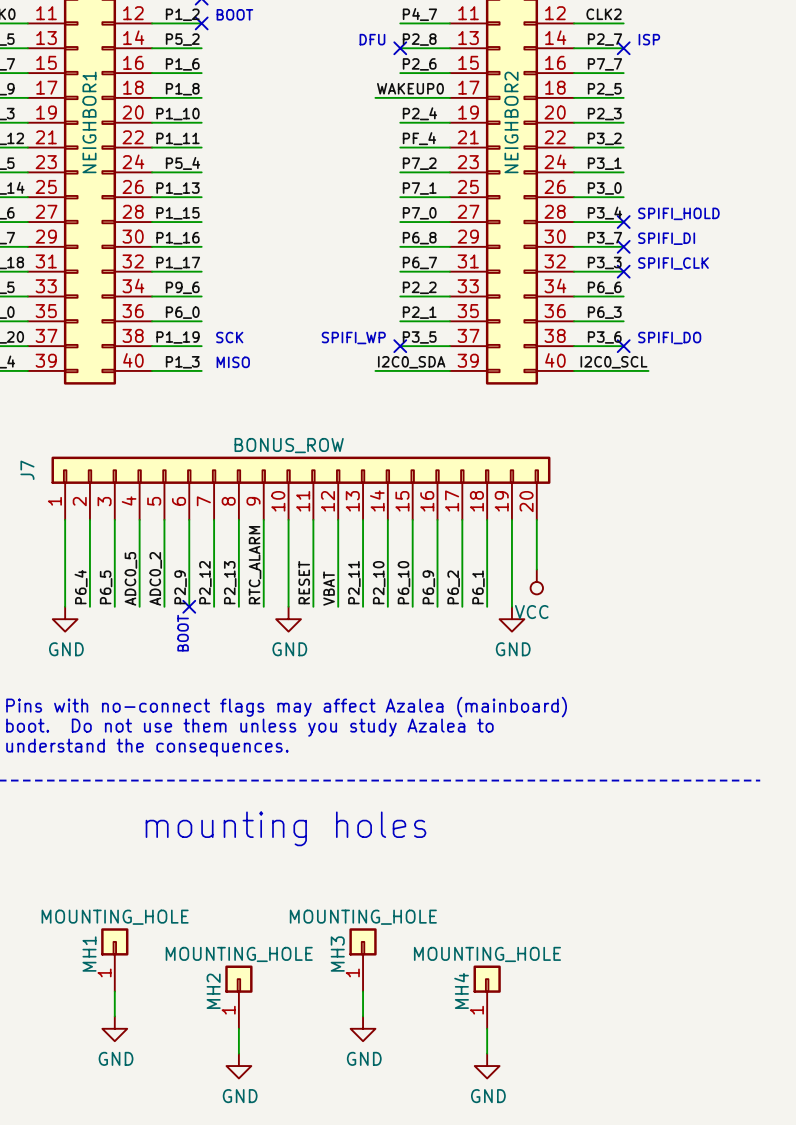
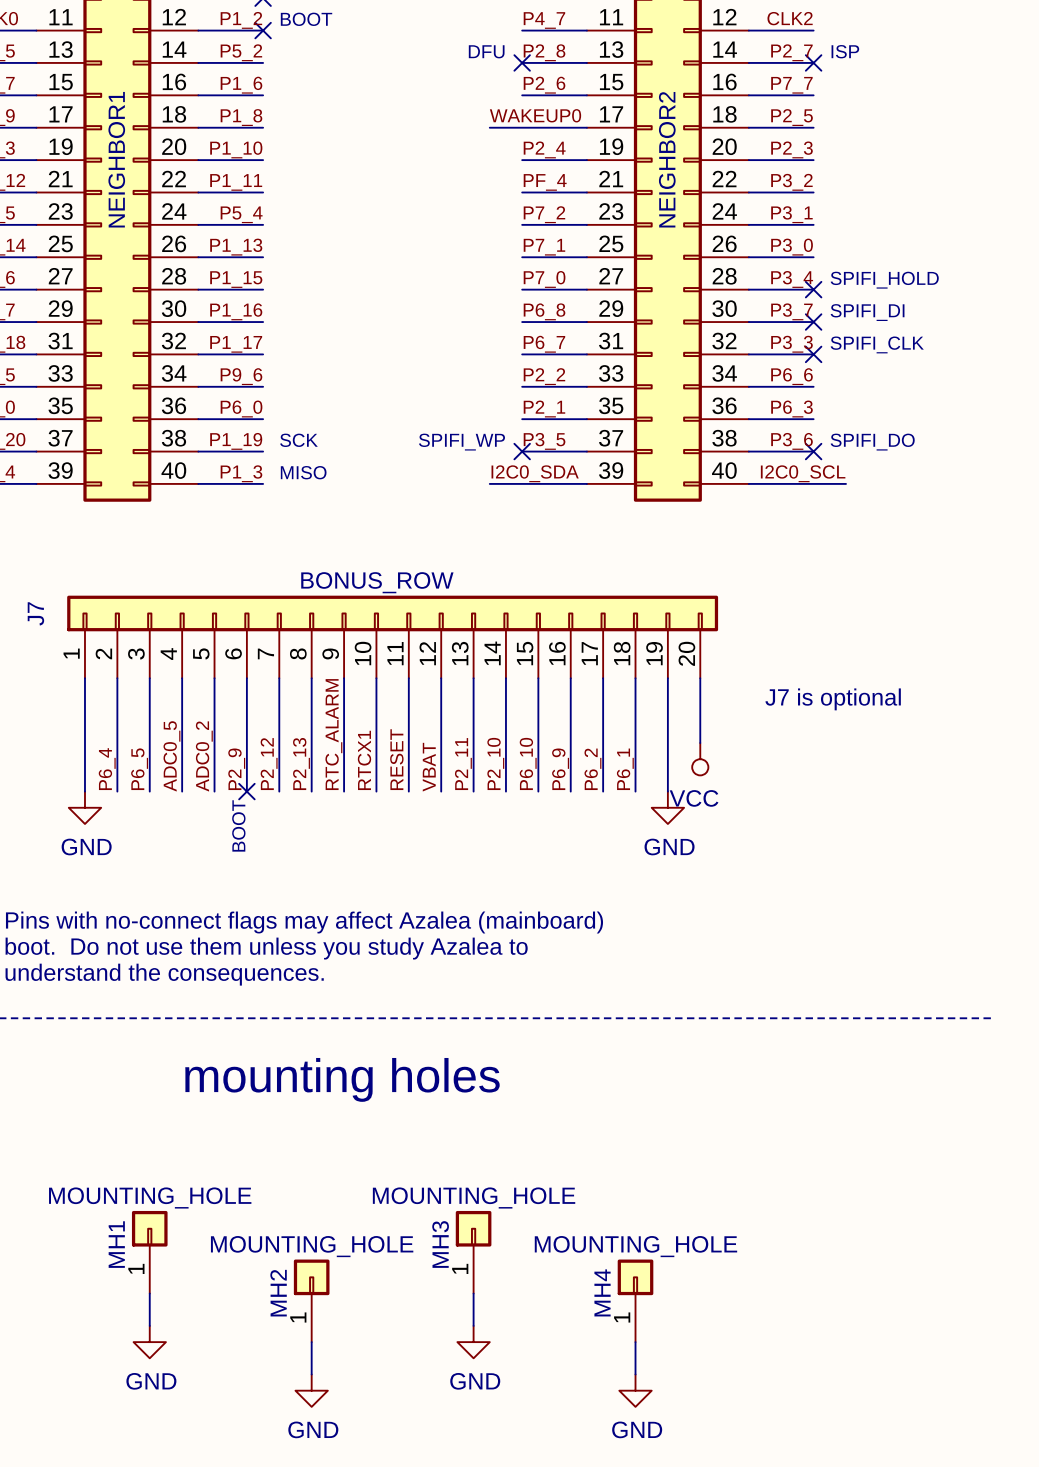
text: none -> J7 is optional (833, 699)
label: none -> RTCX1 (364, 760)
power symbol: GND (288, 619) -> none

